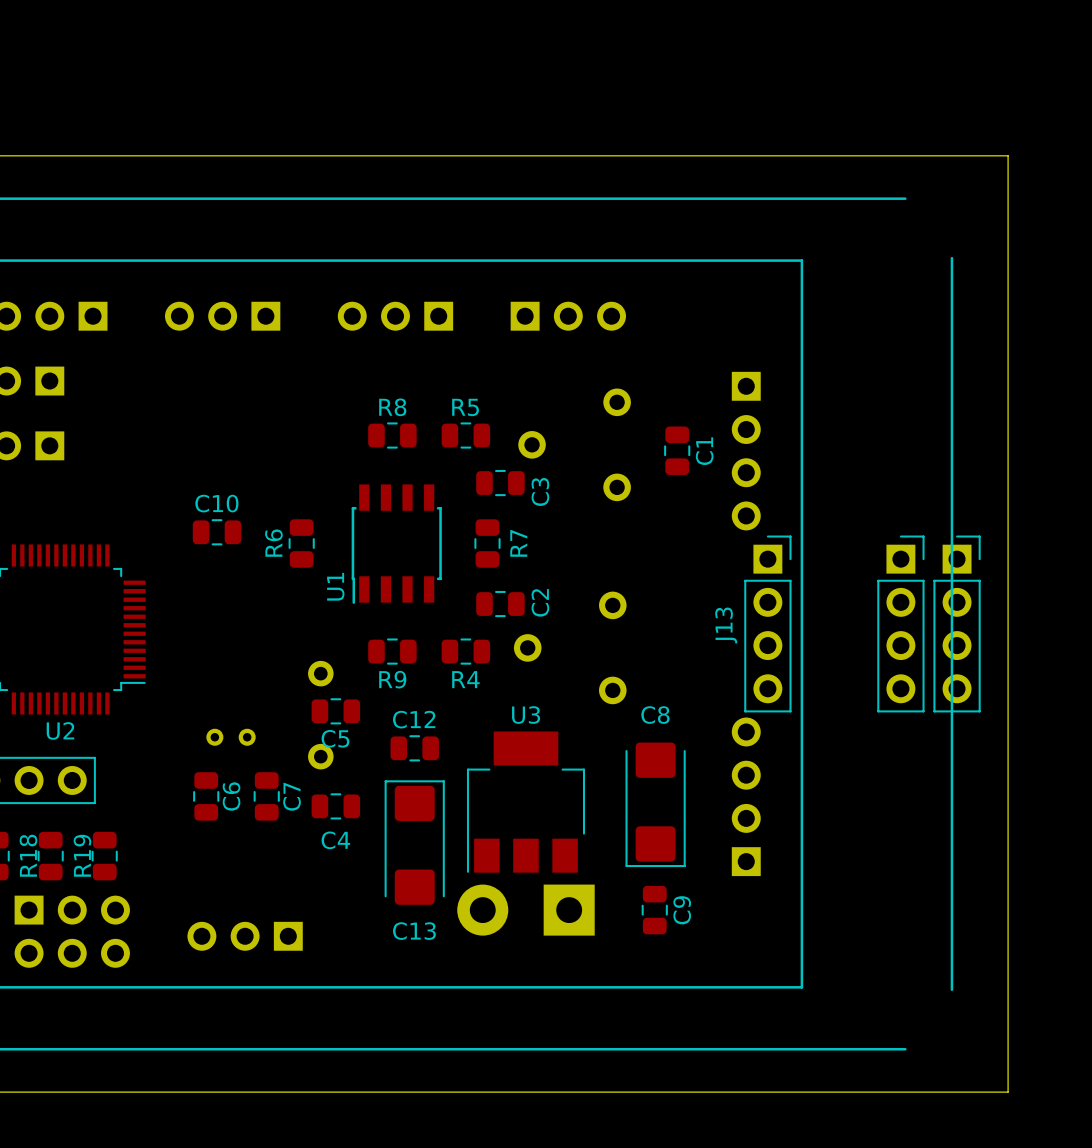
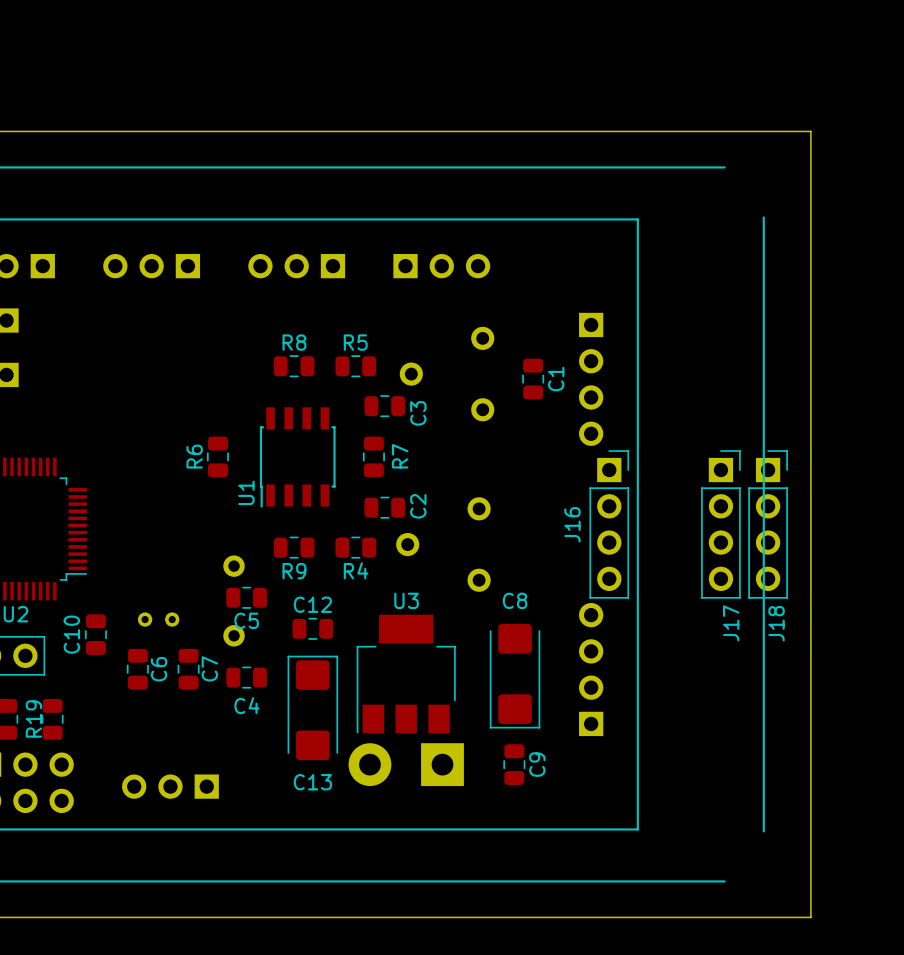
C10 name position: C10 (216, 503) -> C10 (71, 634)
C10 rotation: 0° (217, 532) -> 90° clockwise (95, 634)
C10 position: (217, 532) -> (95, 634)
J13 name: J13 (726, 625) -> J16 (572, 524)
J17 name: none -> J17 (731, 623)
J18 name: none -> J18 (776, 623)

